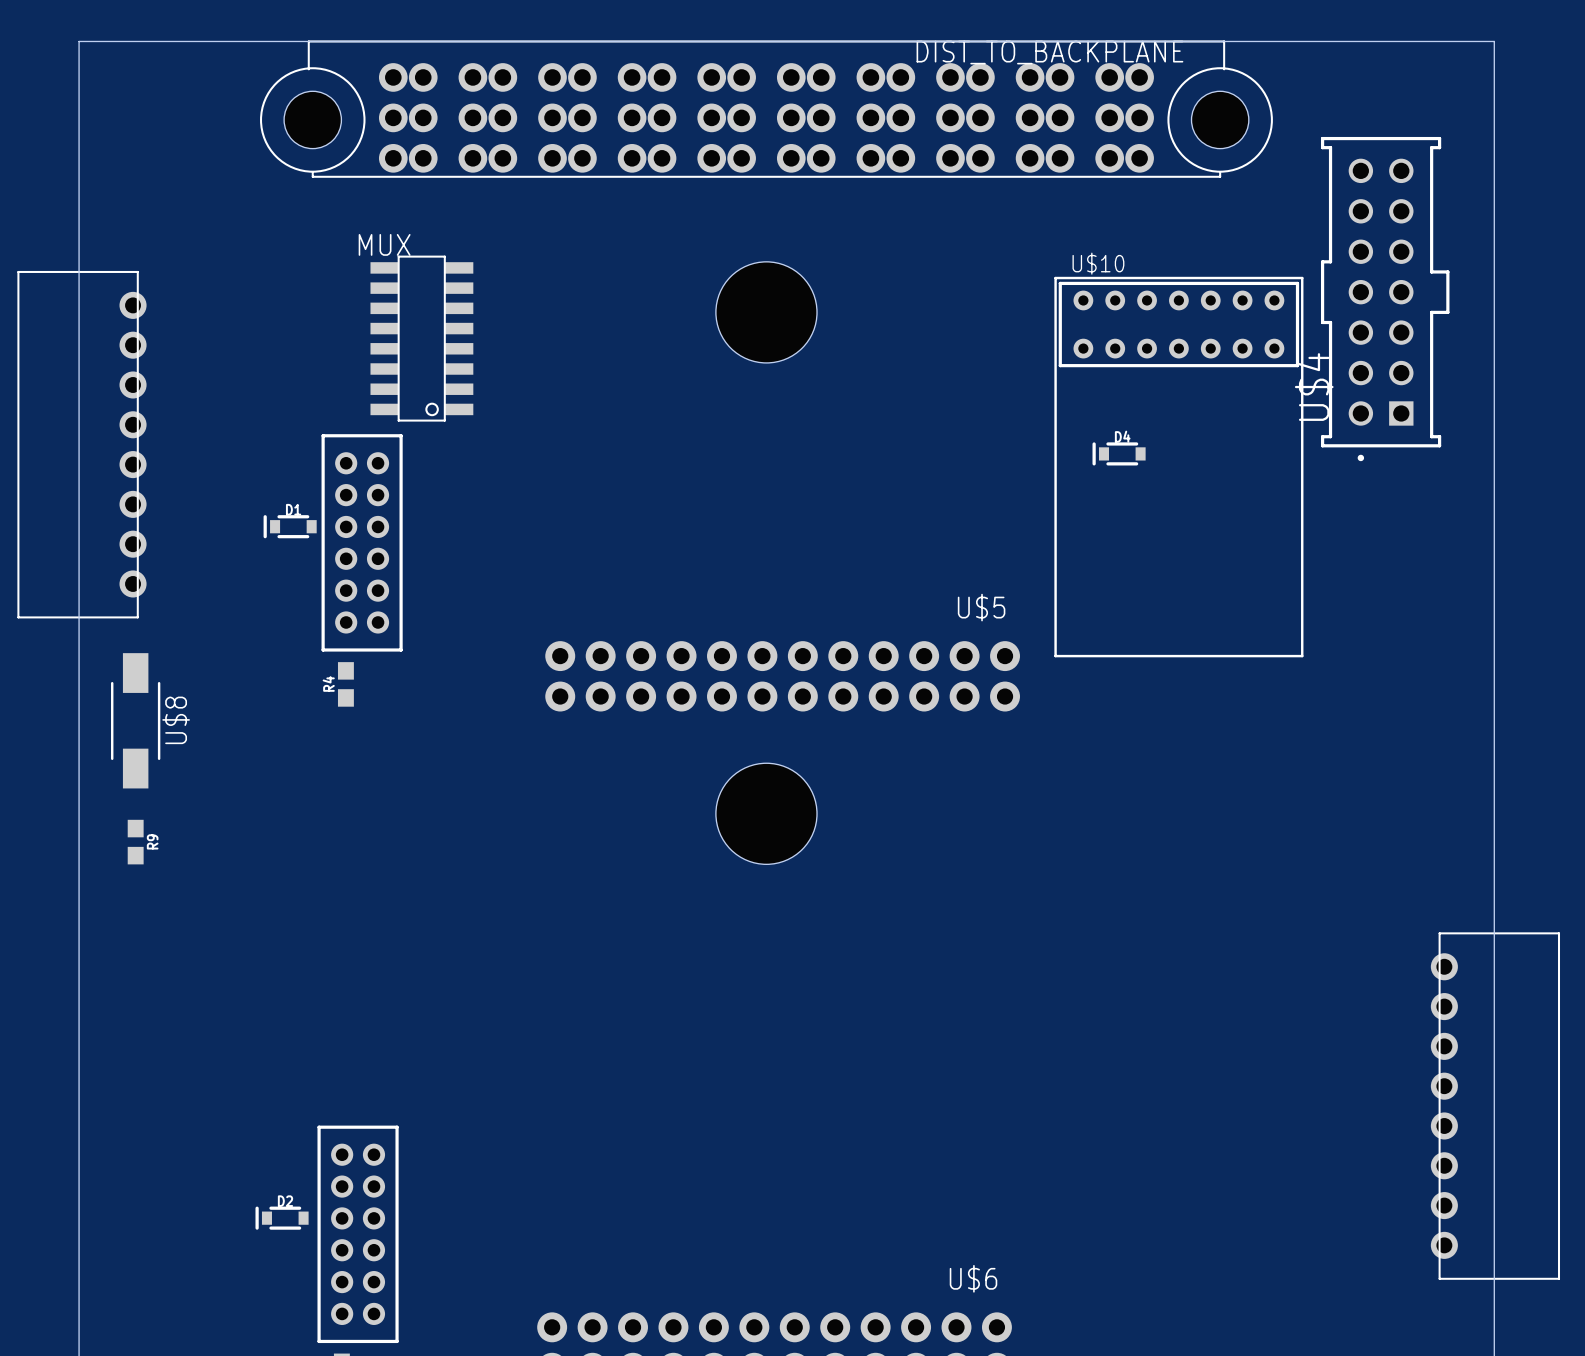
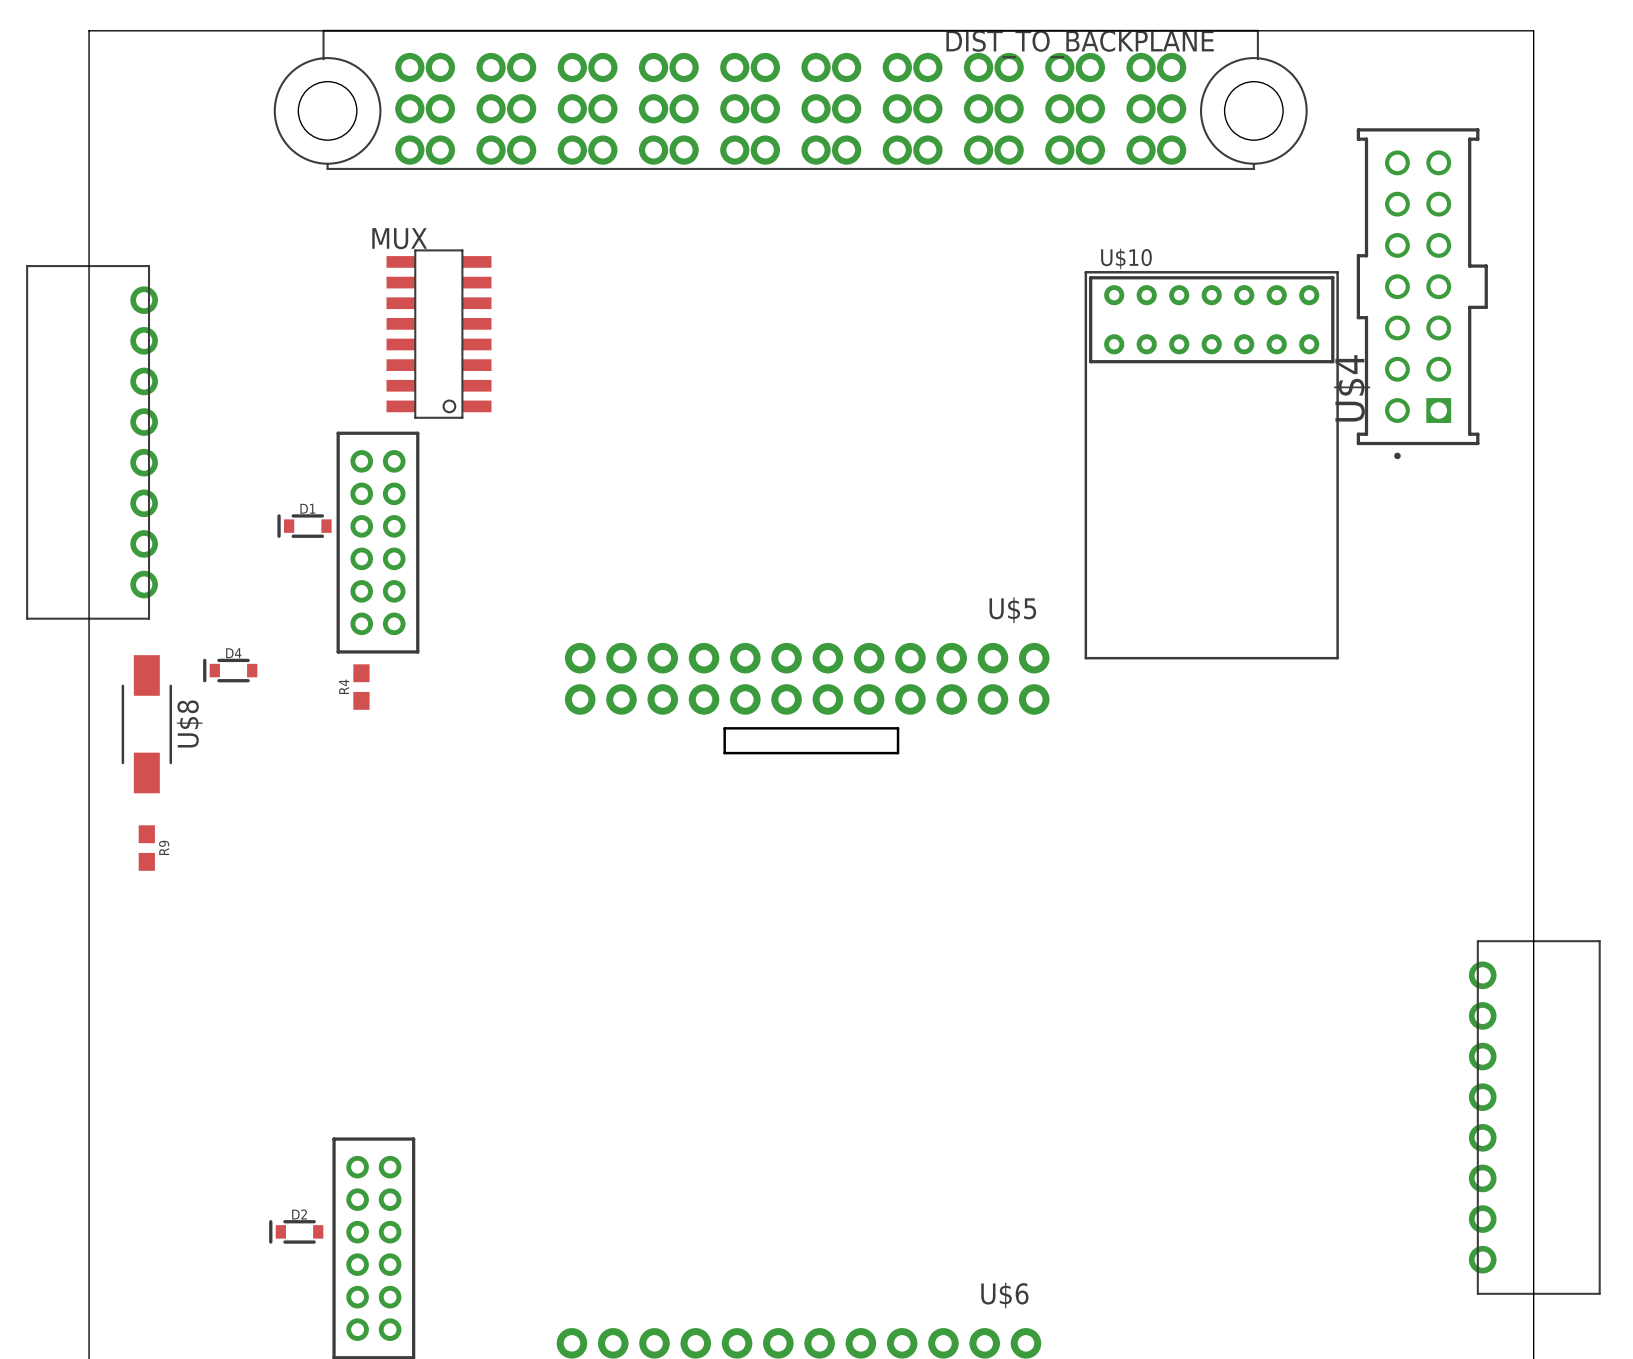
hole: (766, 312) -> none
D4 position: (1119, 453) -> (230, 670)
board edge: none -> (724, 728) (898, 728) (898, 753) (724, 753) (724, 728)
hole: (766, 813) -> none

